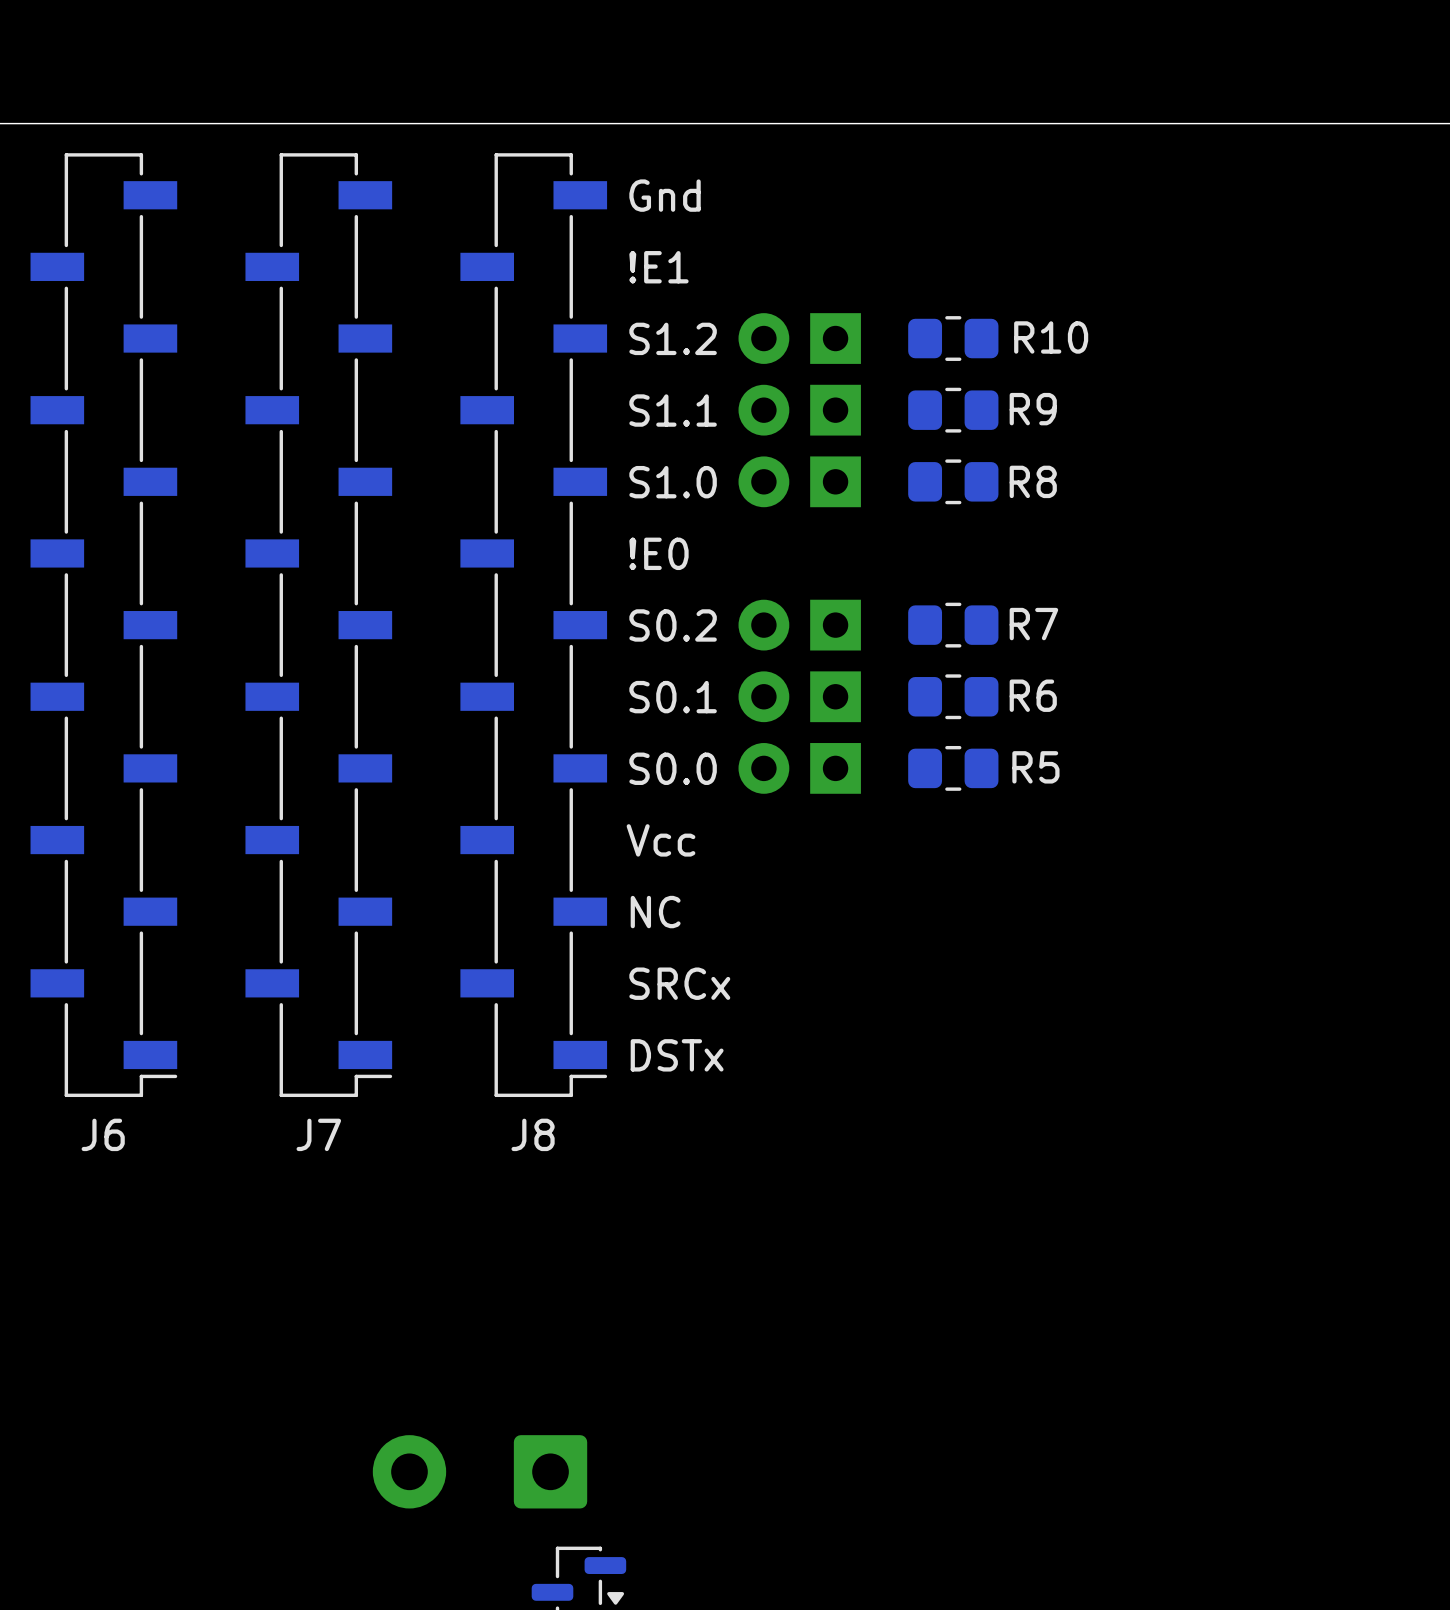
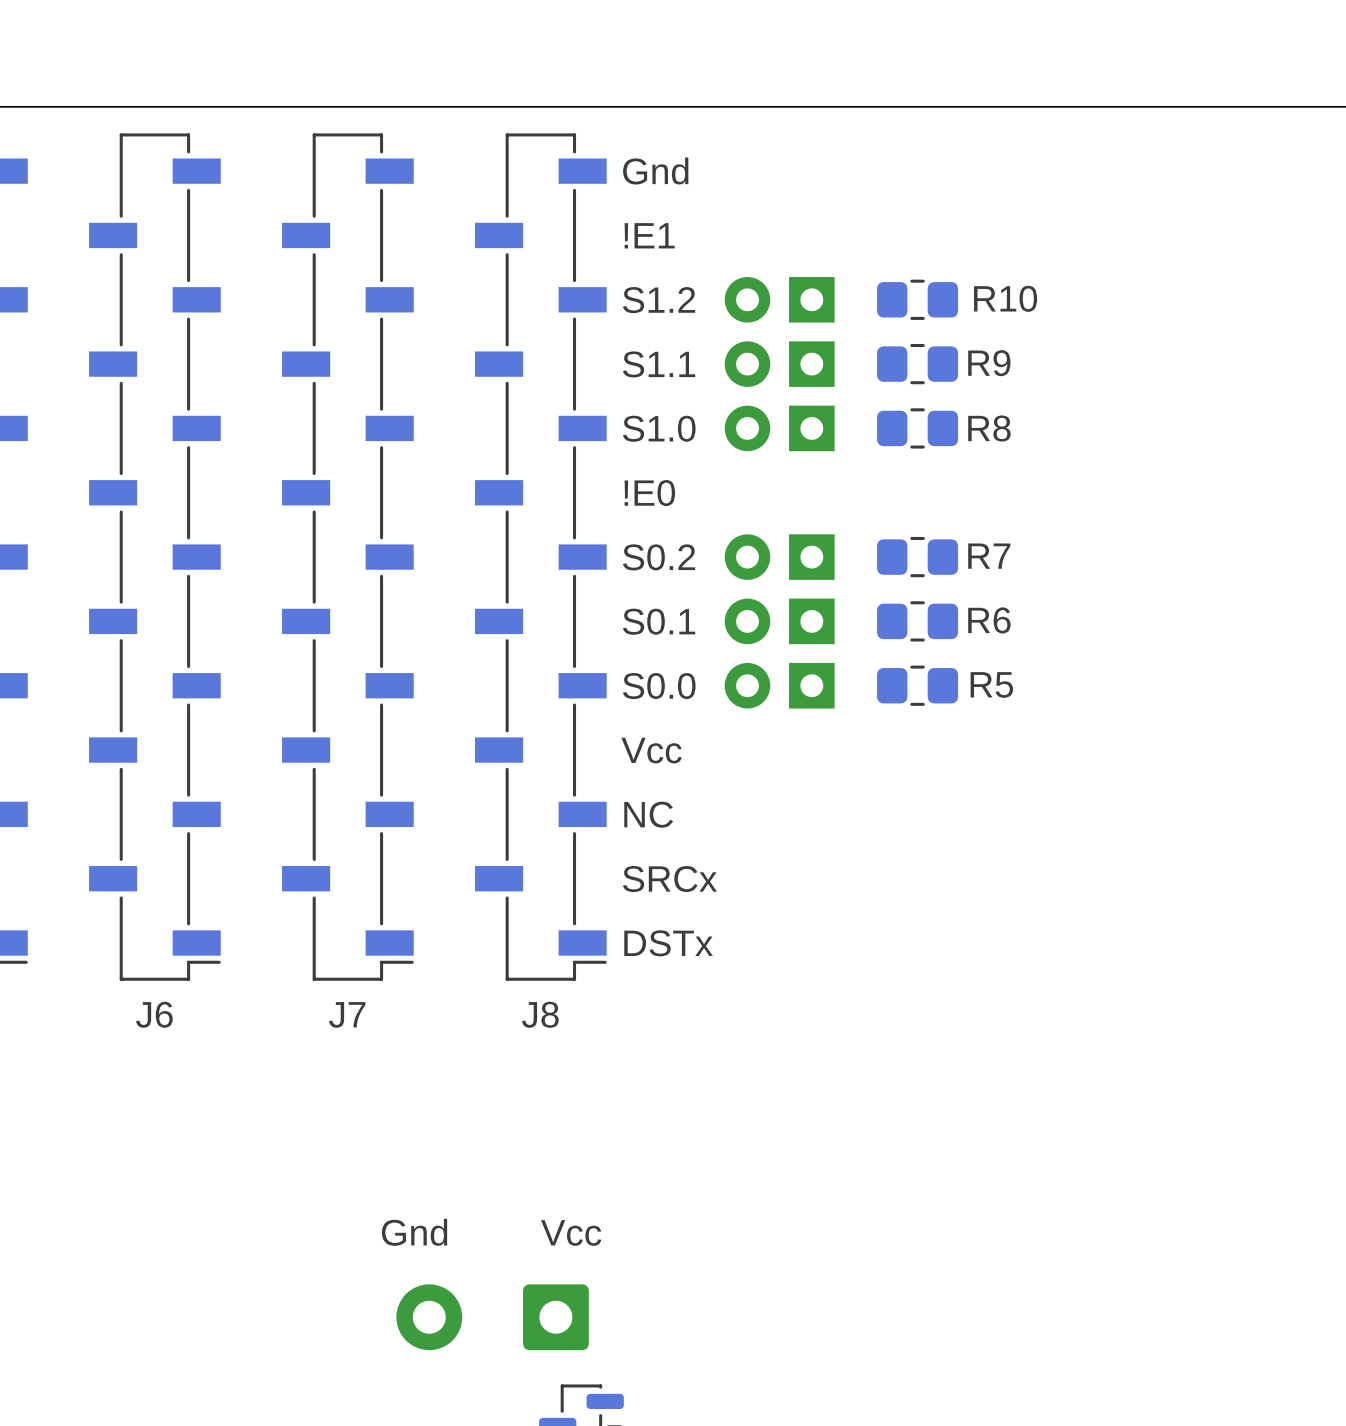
text: none -> Gnd (414, 1232)
text: none -> Vcc (571, 1232)

